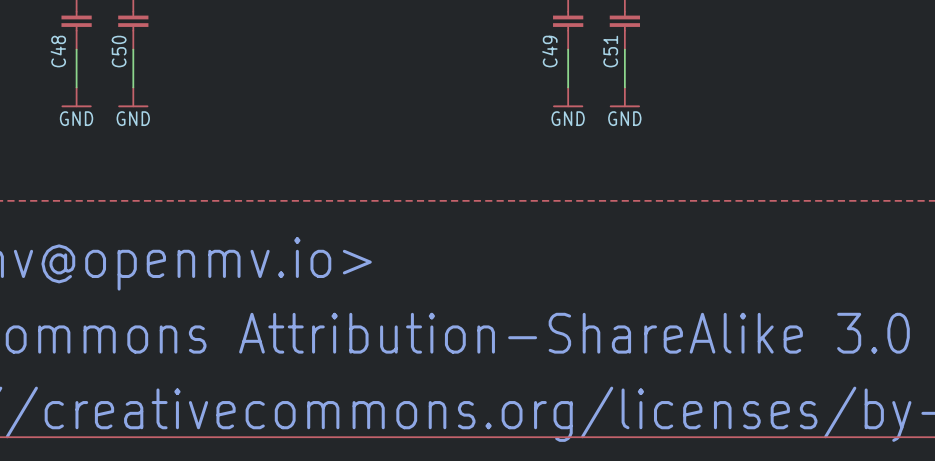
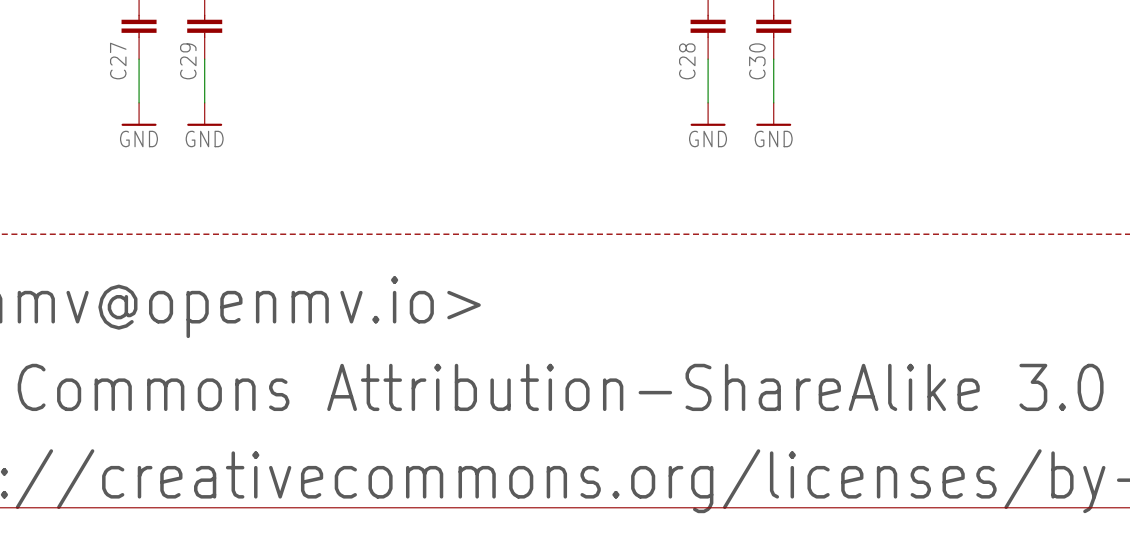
C48 name: C48 (58, 51) -> C27 (118, 61)
C50 name: C50 (119, 51) -> C29 (188, 61)
C49 name: C49 (549, 51) -> C28 (687, 61)
C51 name: C51 (610, 51) -> C30 (757, 61)

